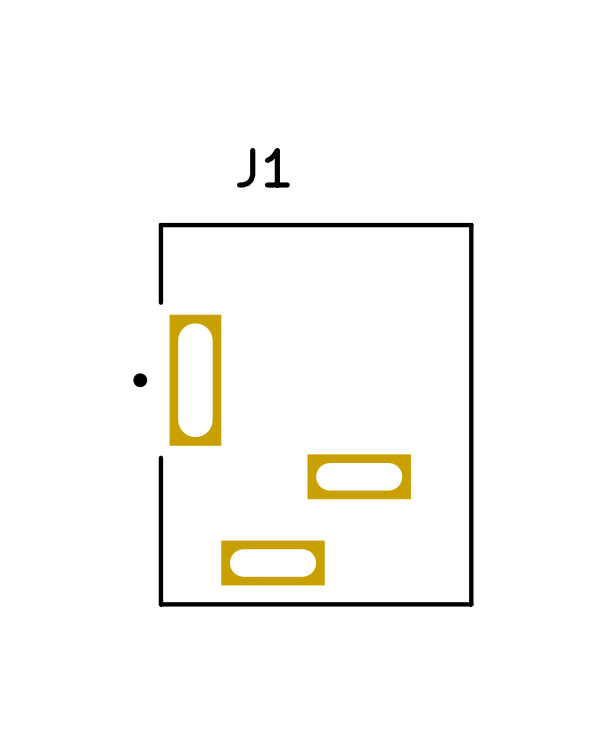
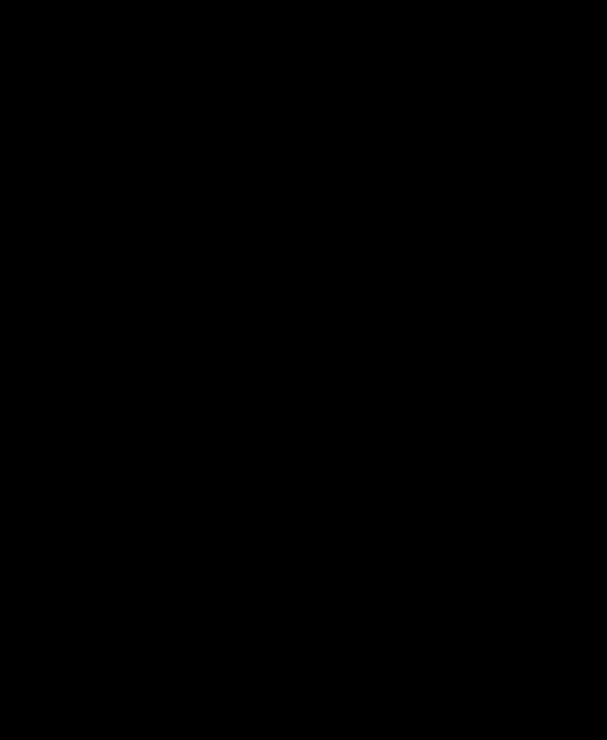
J1: (303, 414) -> none

